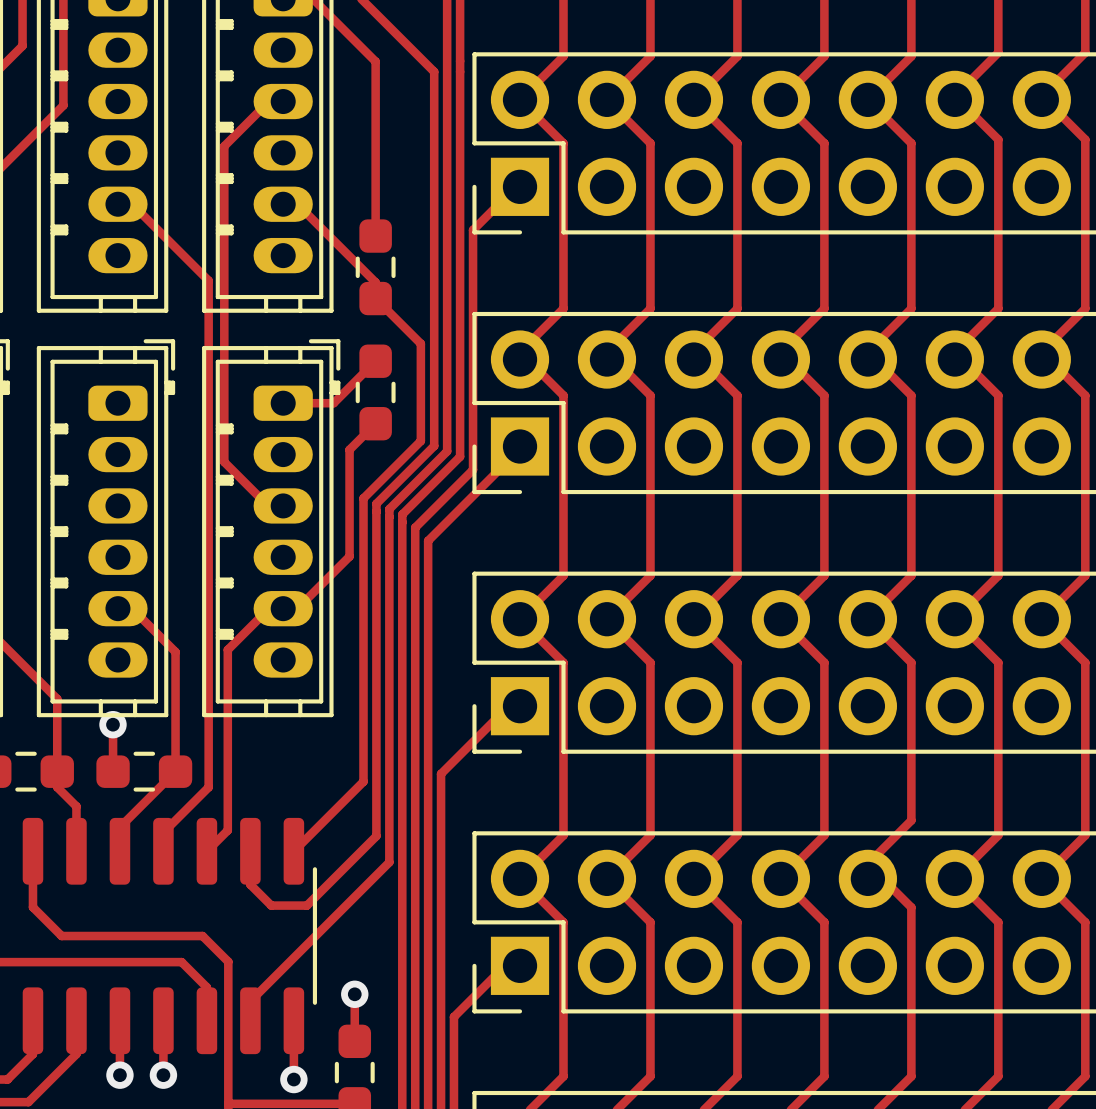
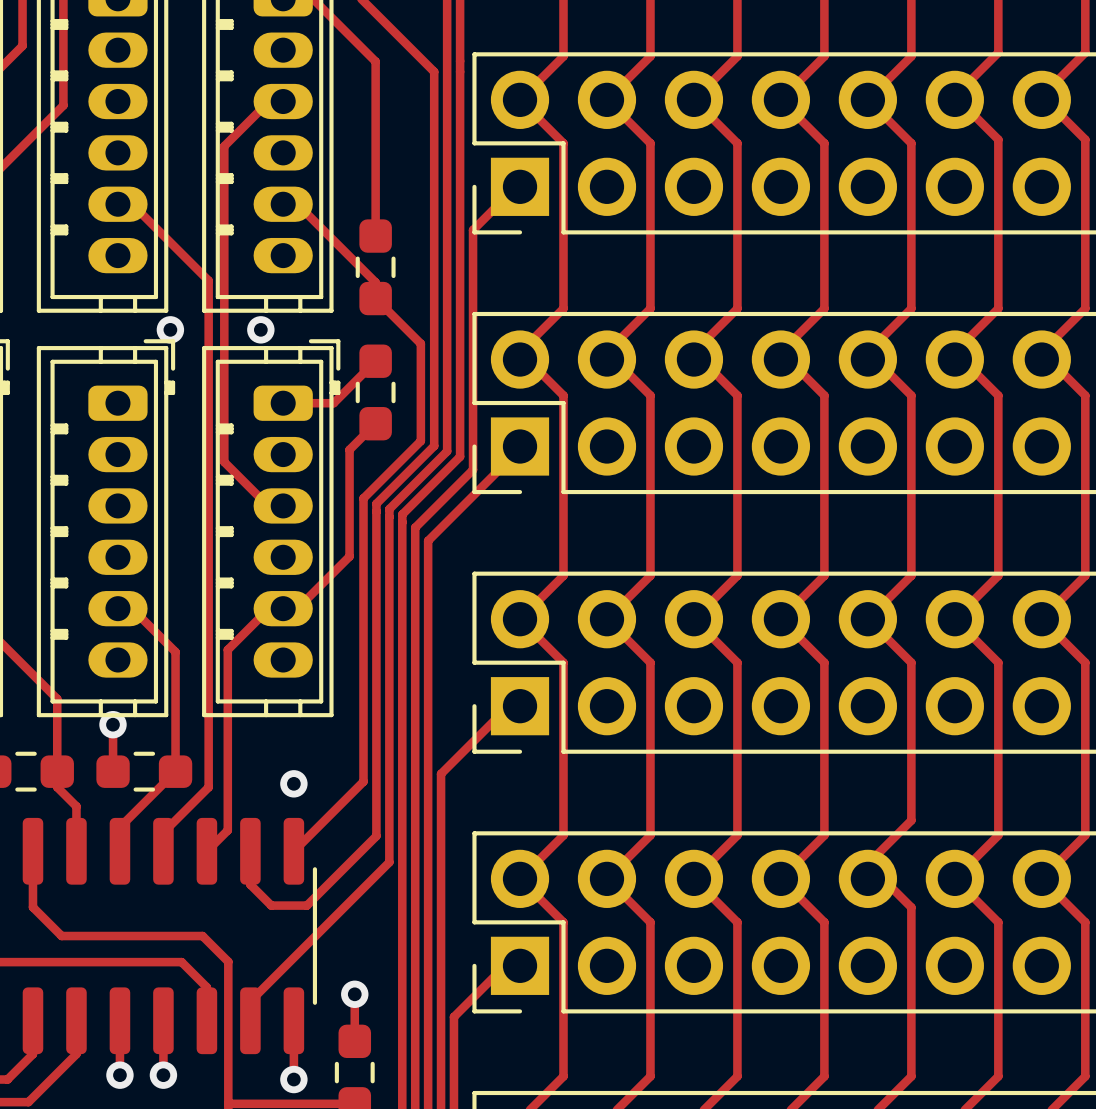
via: none -> (170, 329)
via: none -> (260, 329)
via: none -> (293, 783)

